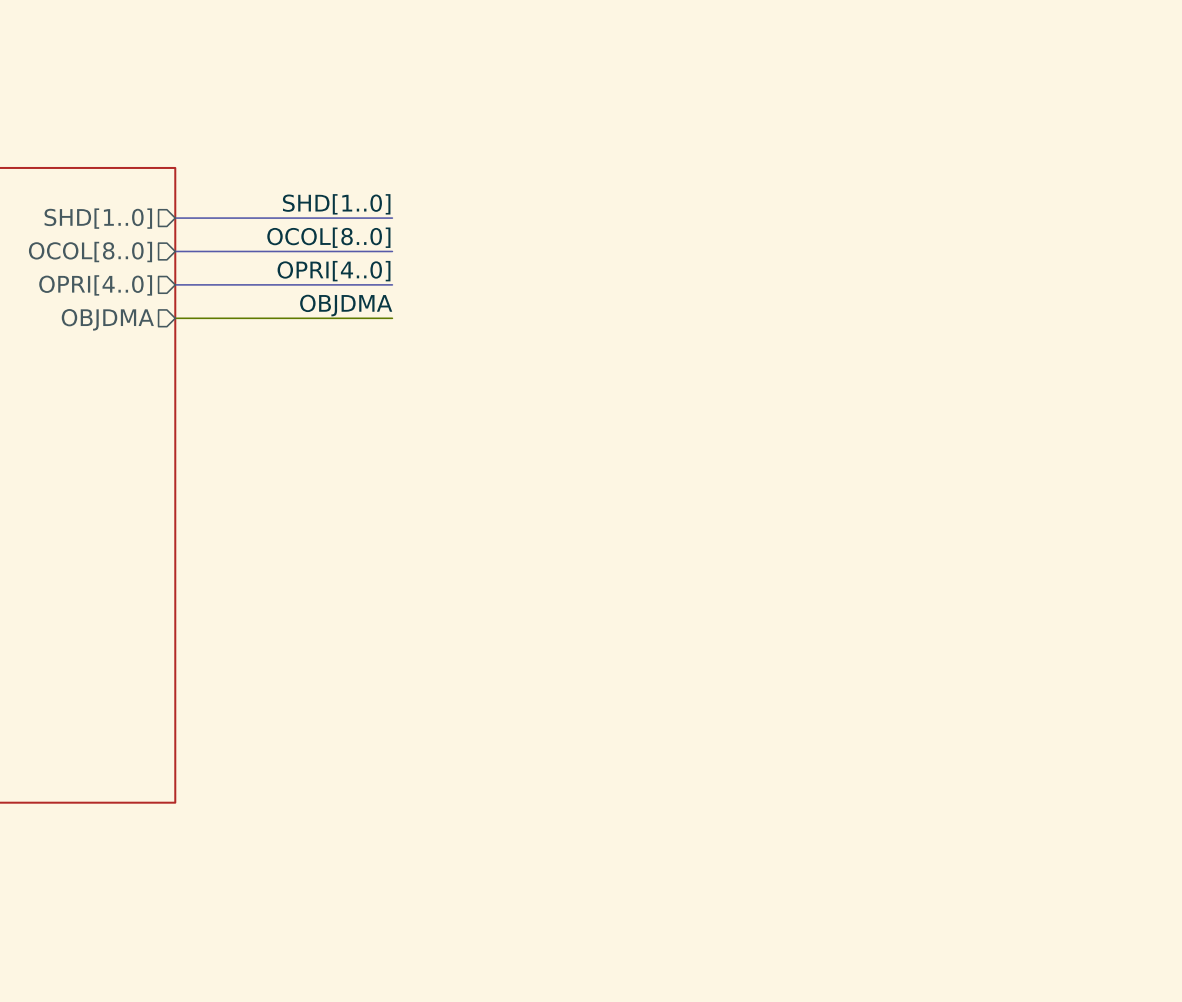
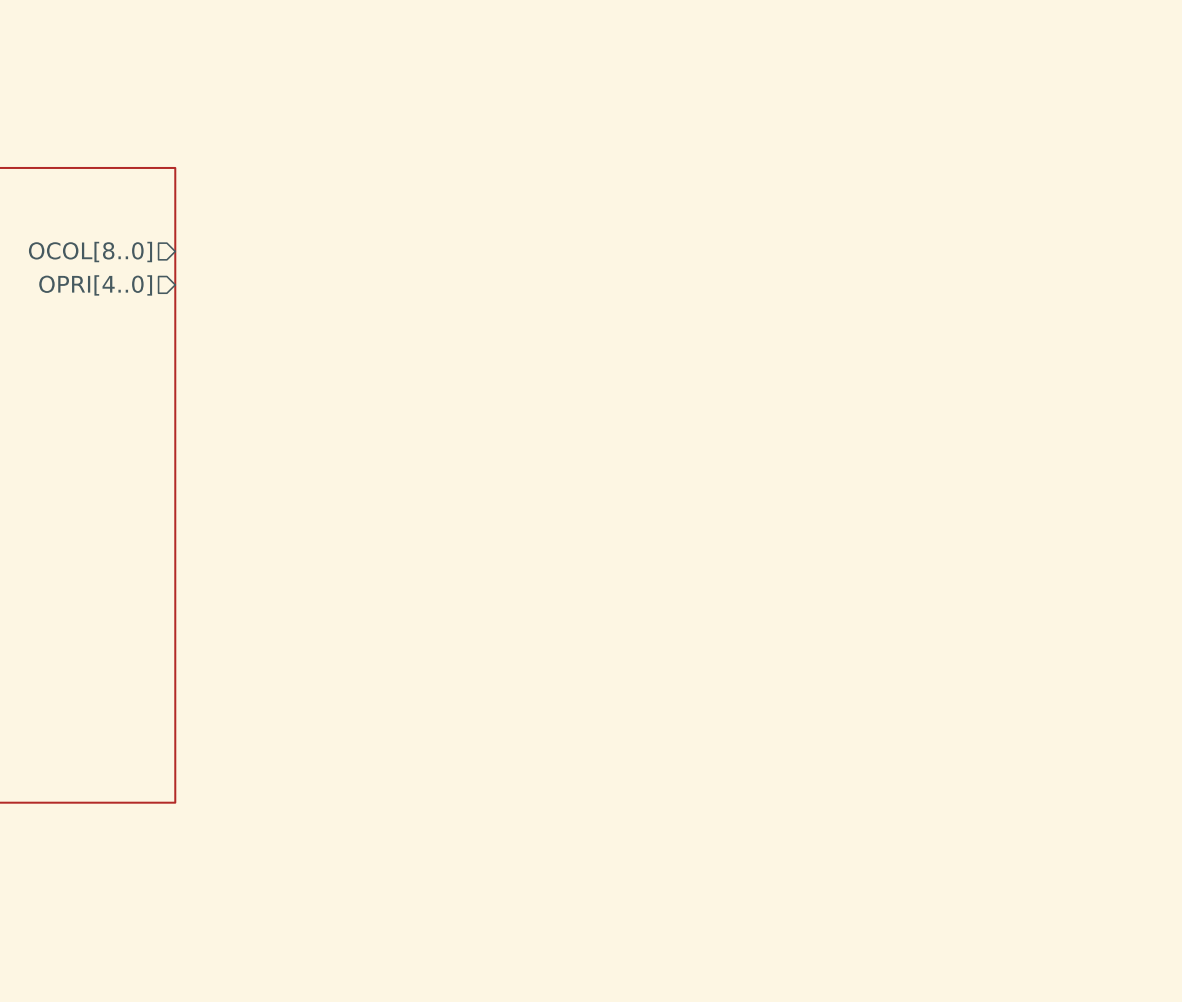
label: SHD[1..0] (336, 204) -> none
sheet pin: SHD[1..0] (98, 218) -> none
bus: (175, 218) (392, 218) -> none
label: OCOL[8..0] (328, 237) -> none
bus: (175, 251) (392, 251) -> none
label: OPRI[4..0] (334, 271) -> none
bus: (175, 284) (392, 284) -> none
label: OBJDMA (346, 305) -> none
wire: (175, 318) (392, 318) -> none
sheet pin: OBJDMA (107, 319) -> none

